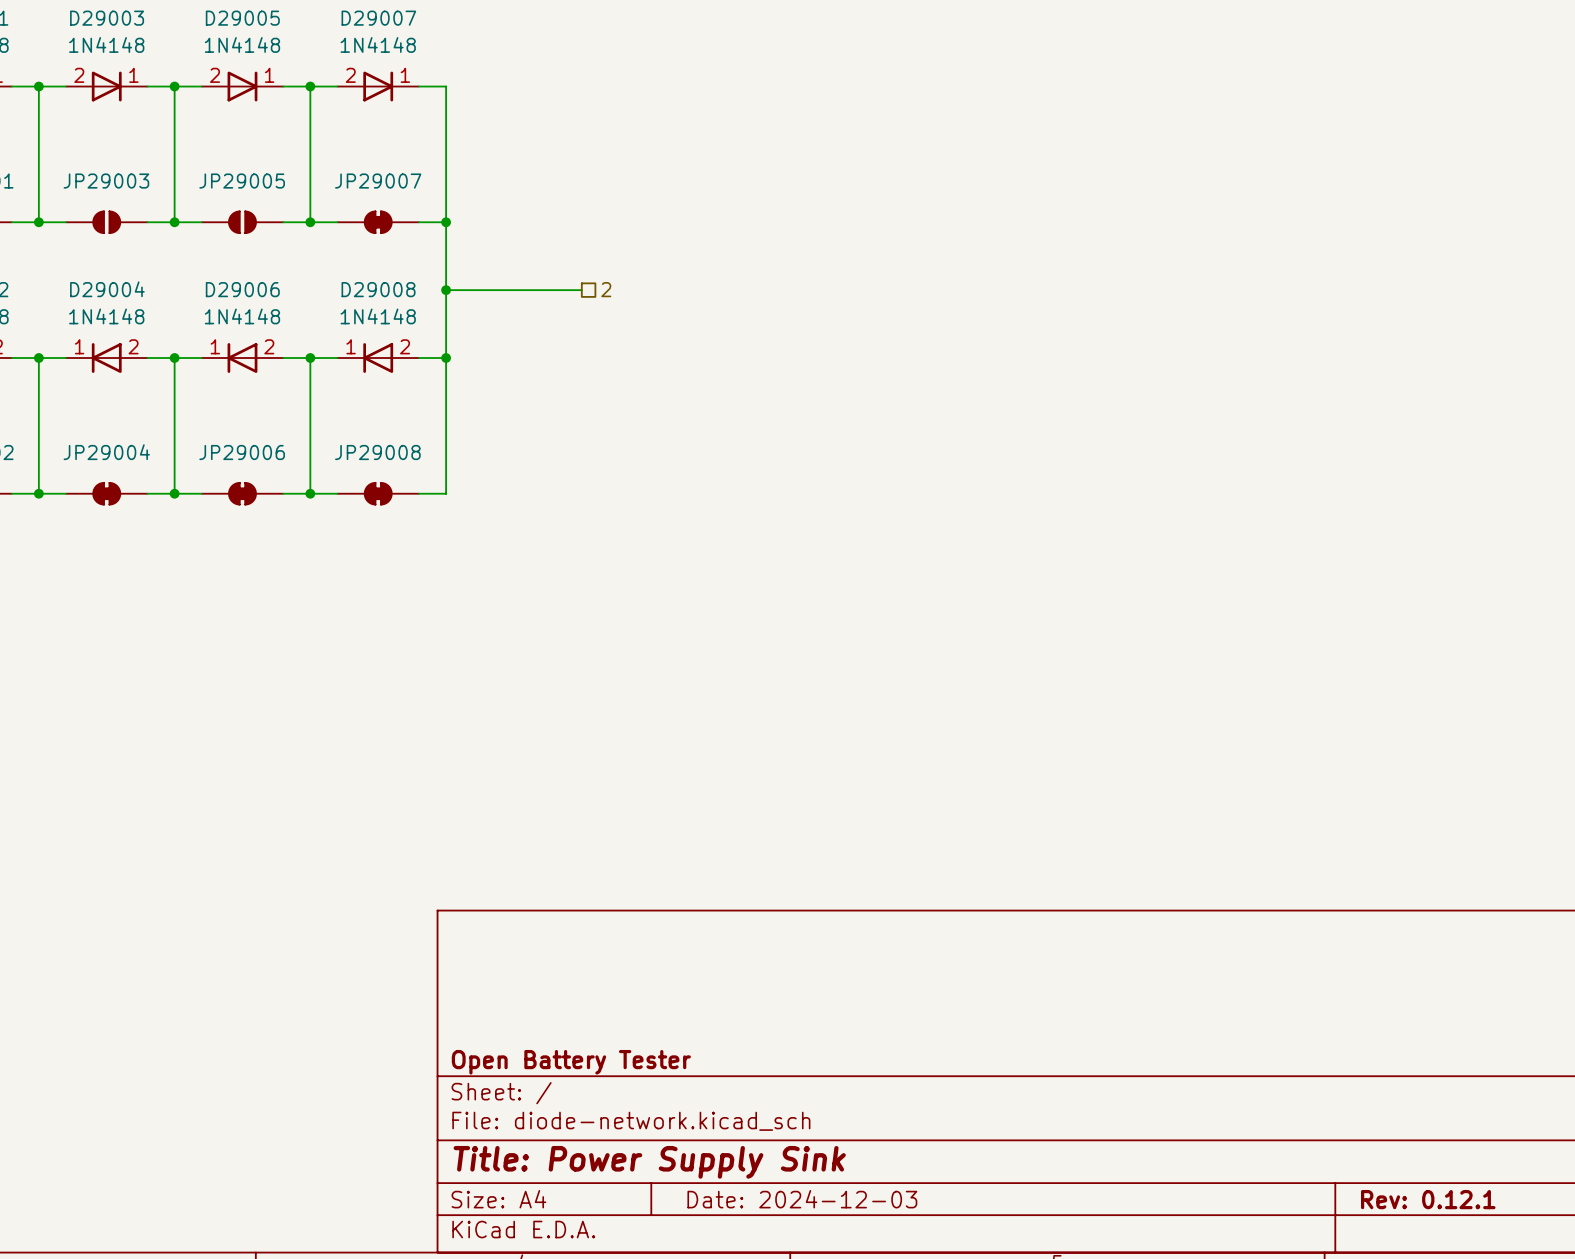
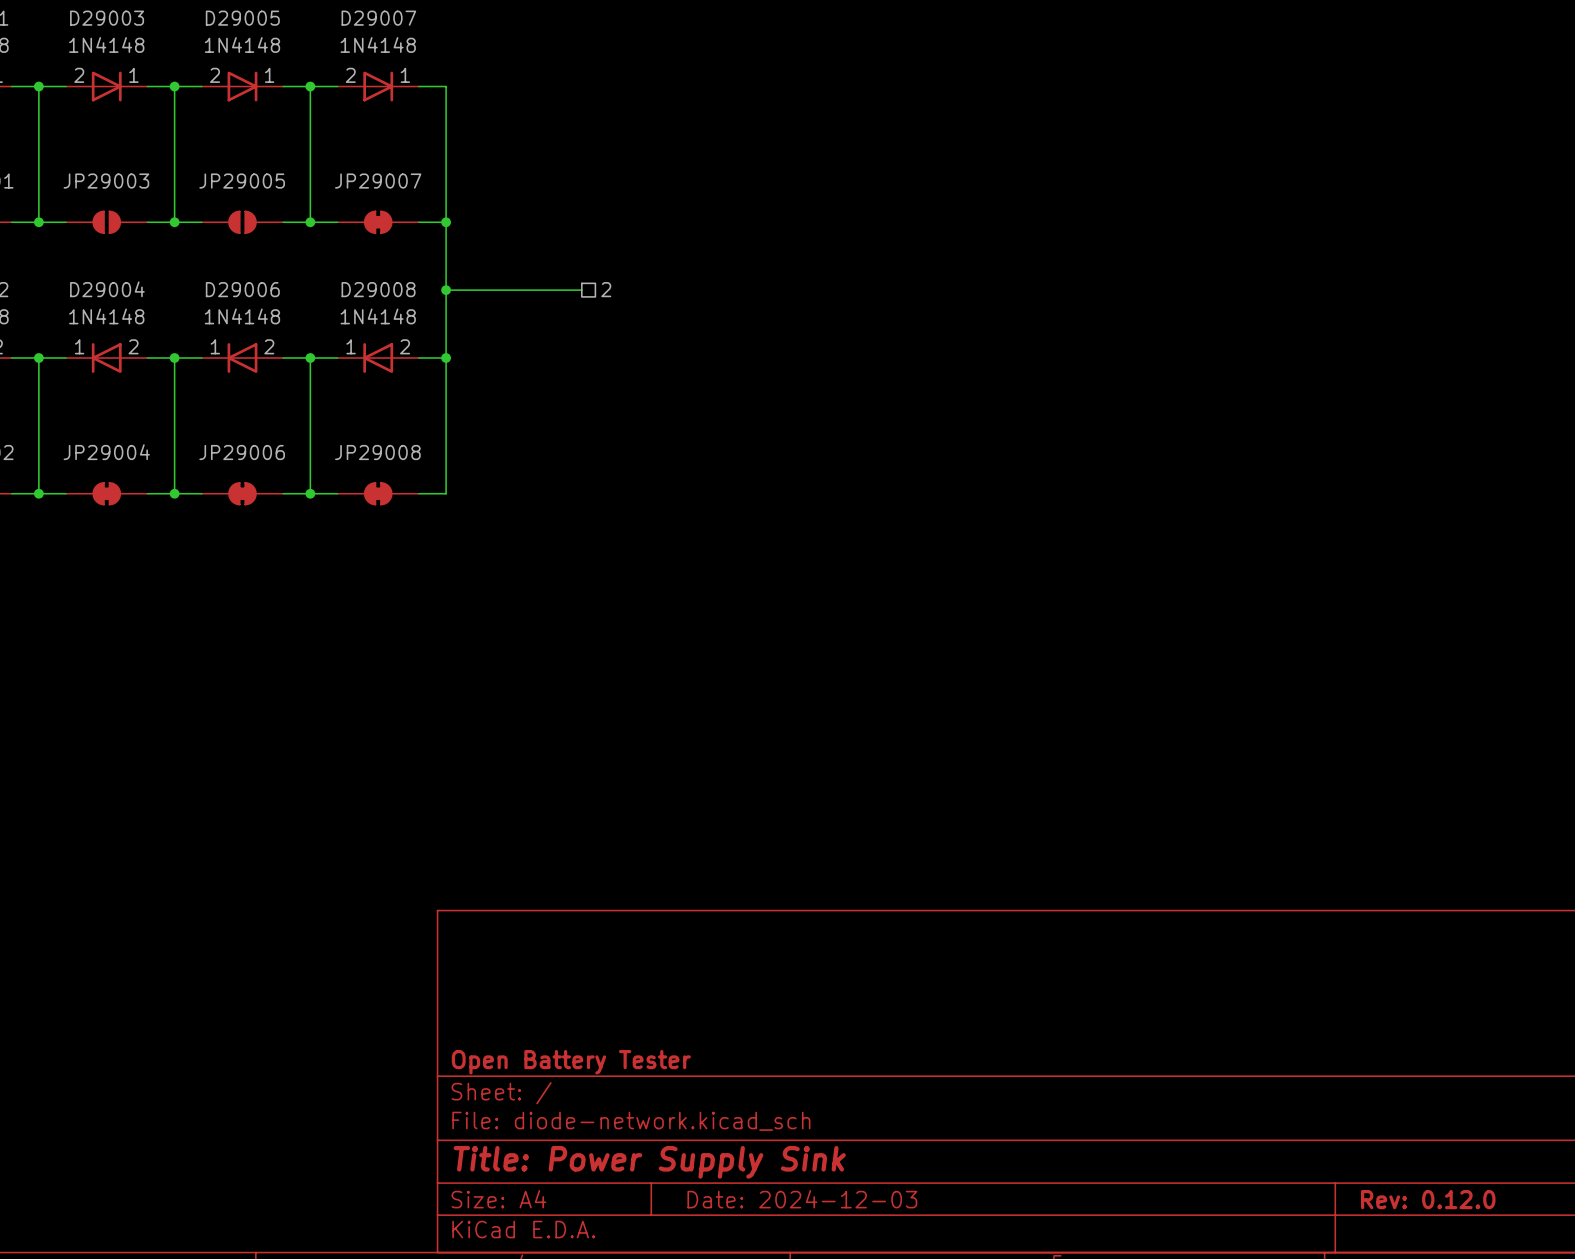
title block: Rev: 0.12.1 (1428, 1199) -> Rev: 0.12.0 (1428, 1199)

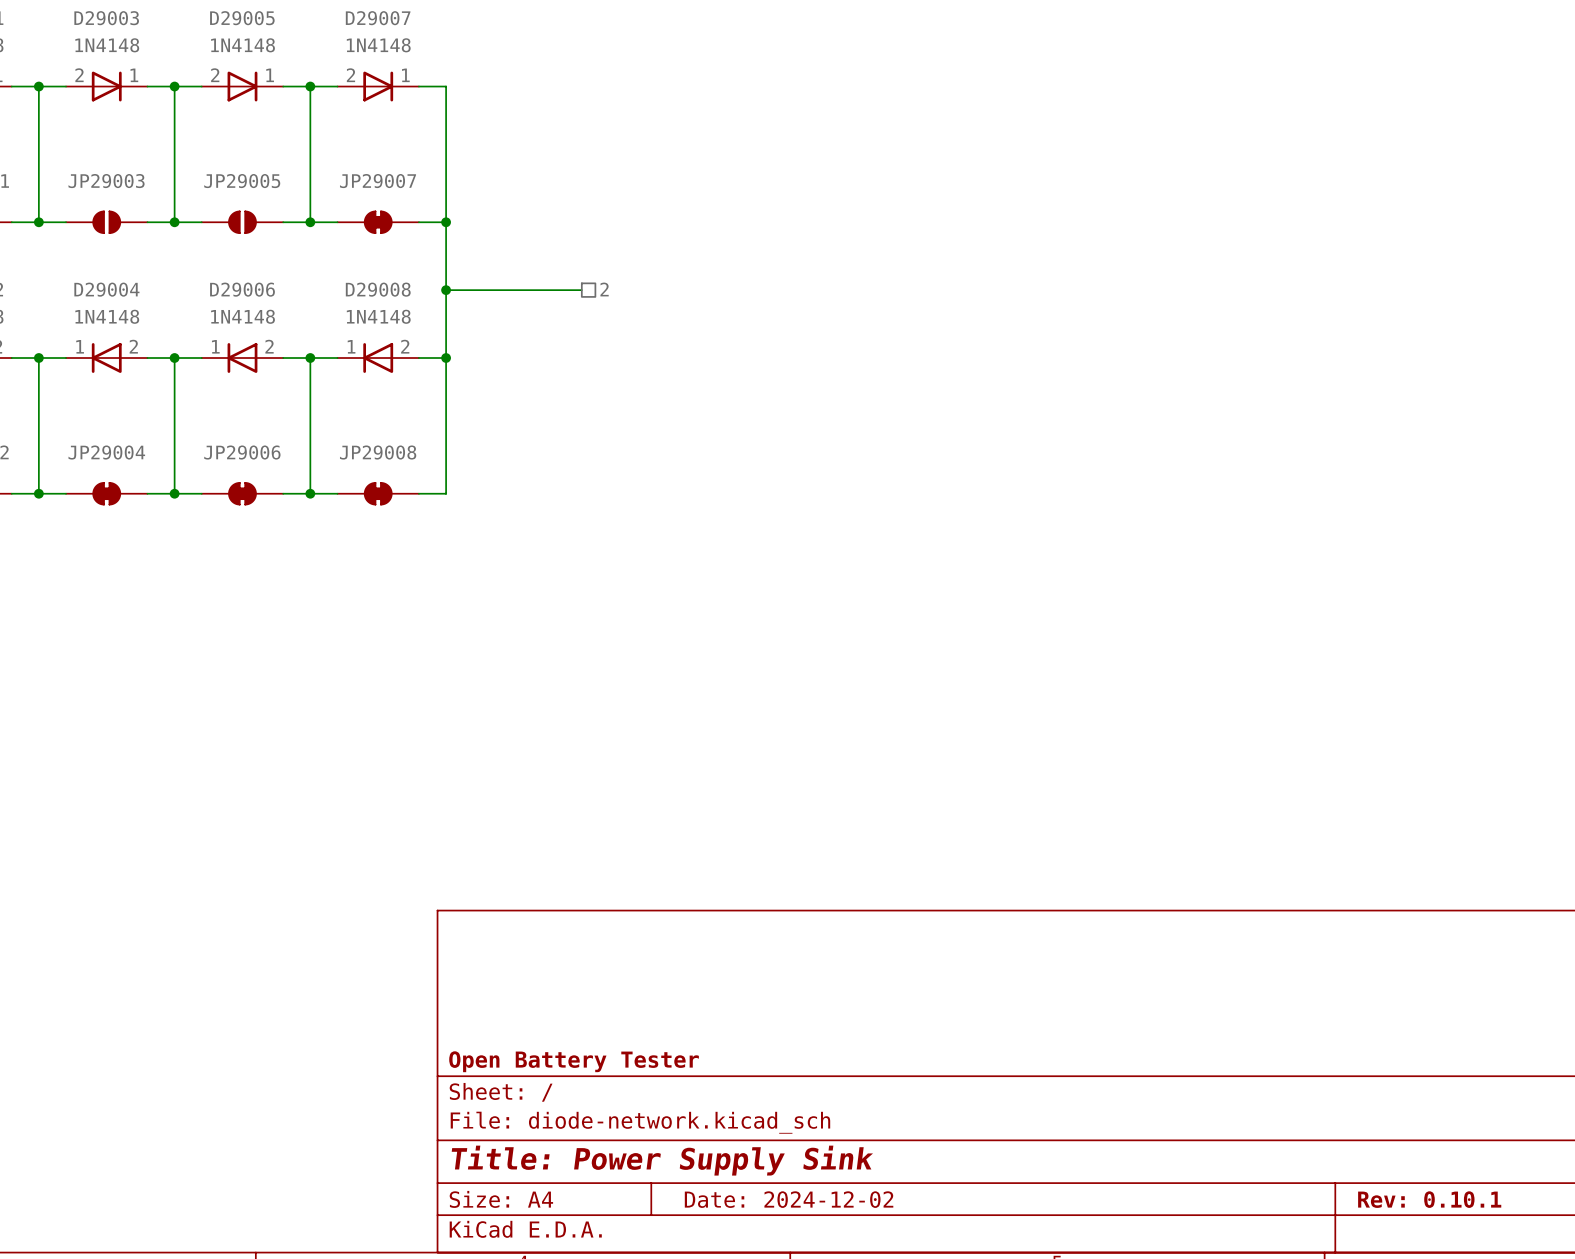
title block: Date: 2024-12-03 (802, 1199) -> Date: 2024-12-02 (789, 1199)
title block: Rev: 0.12.0 (1428, 1199) -> Rev: 0.10.1 (1429, 1199)

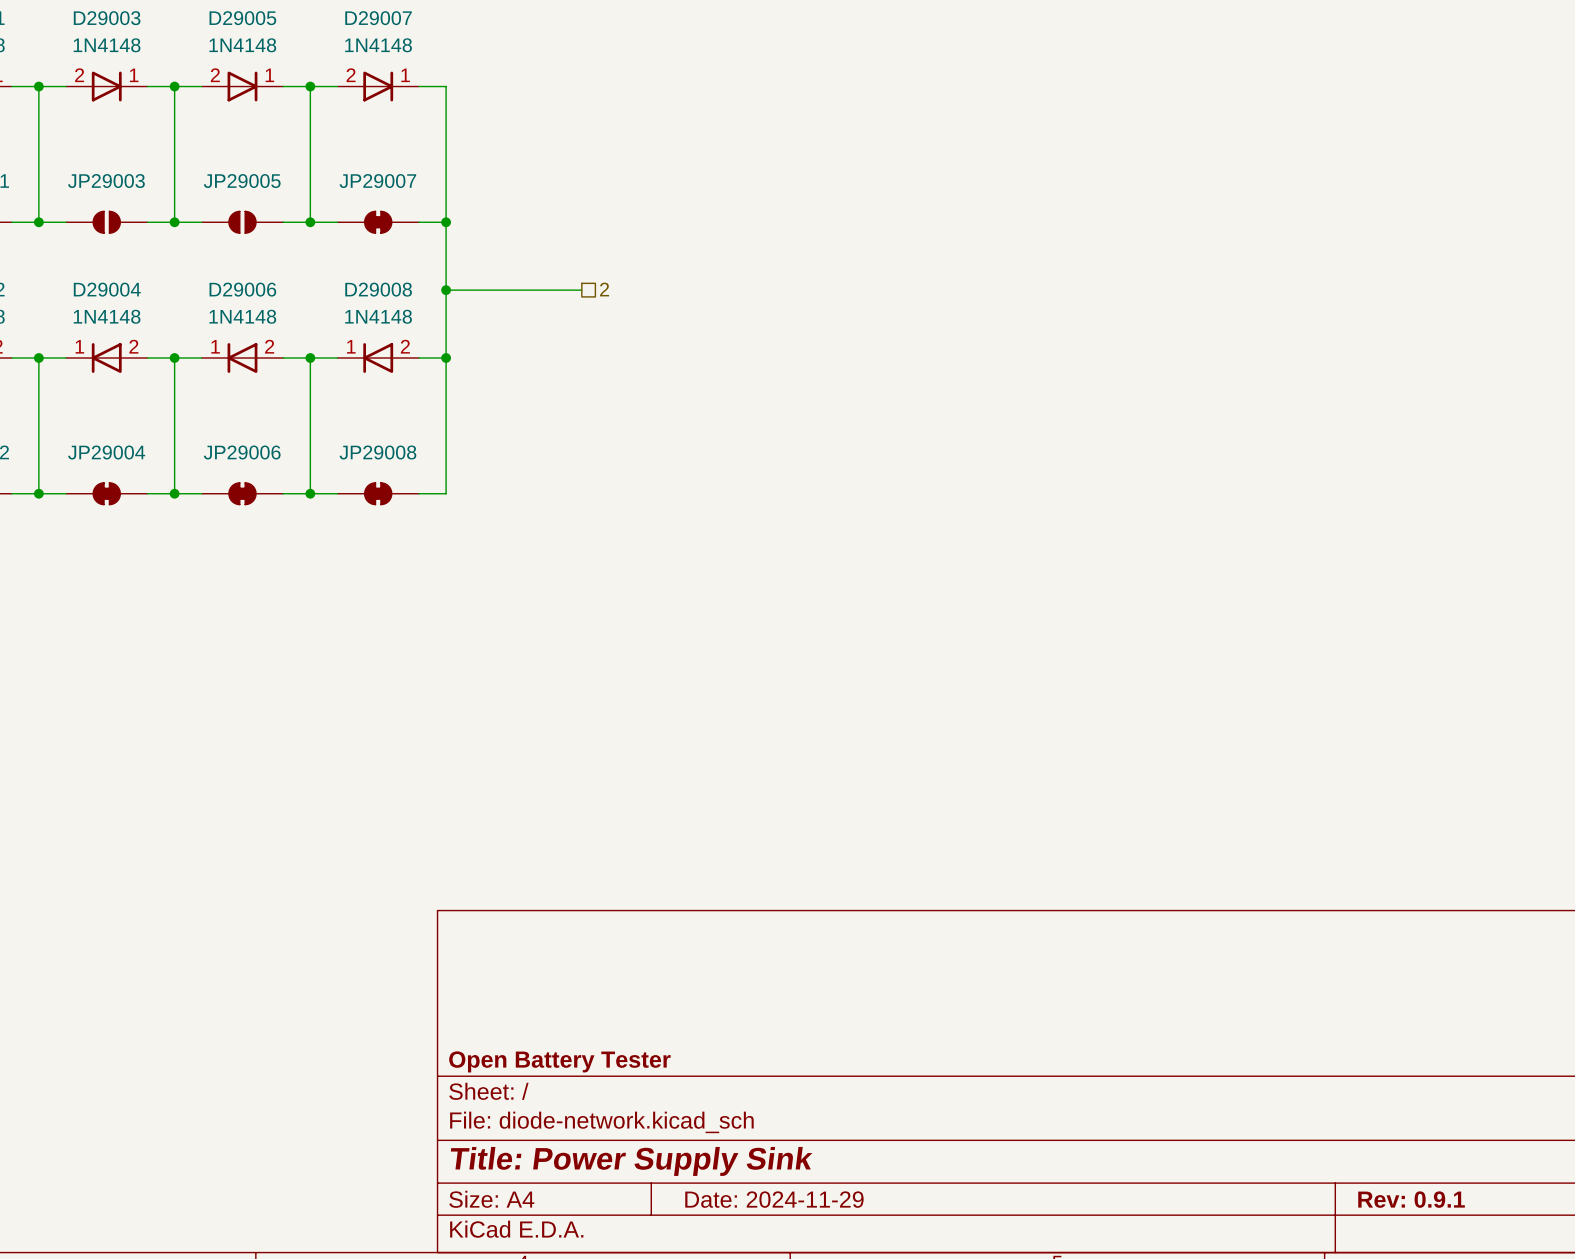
title block: Date: 2024-12-02 (789, 1199) -> Date: 2024-11-29 (774, 1199)
title block: Rev: 0.10.1 (1429, 1199) -> Rev: 0.9.1 (1411, 1199)

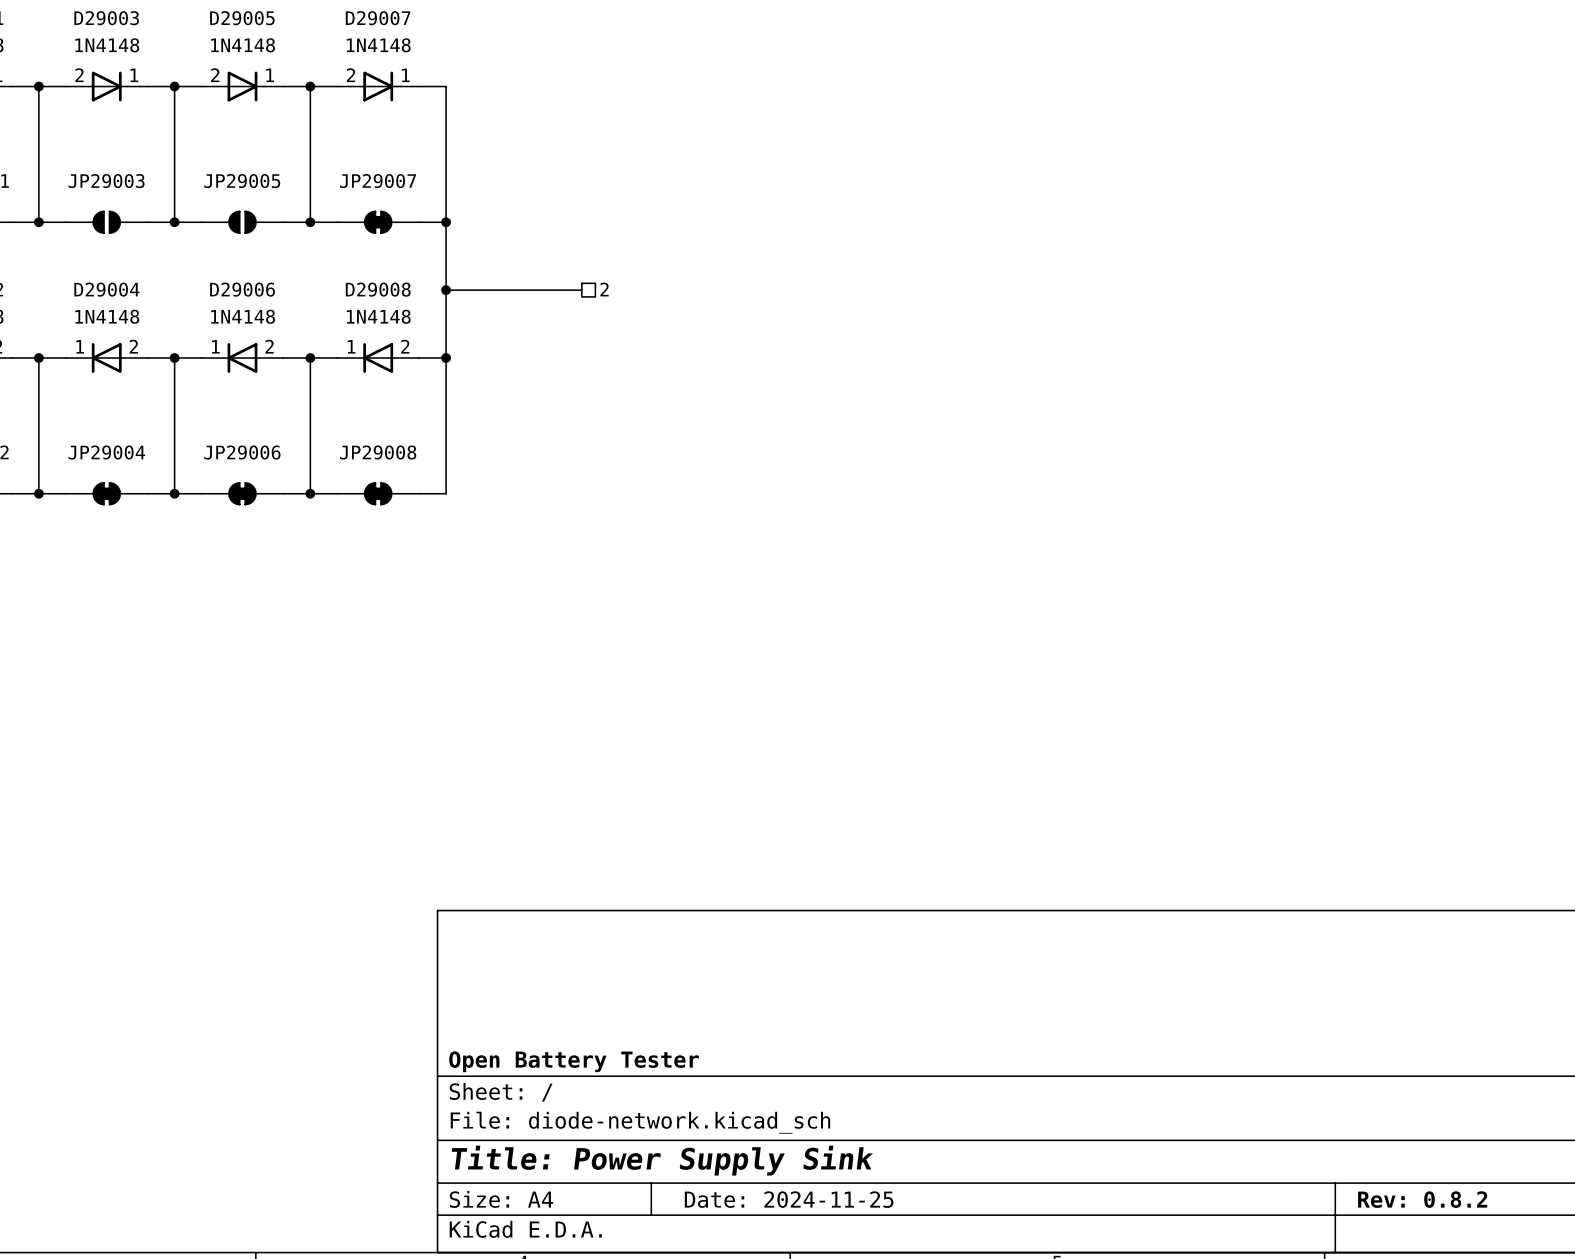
title block: Date: 2024-11-29 (774, 1199) -> Date: 2024-11-25 (789, 1199)
title block: Rev: 0.9.1 (1411, 1199) -> Rev: 0.8.2 (1422, 1199)

